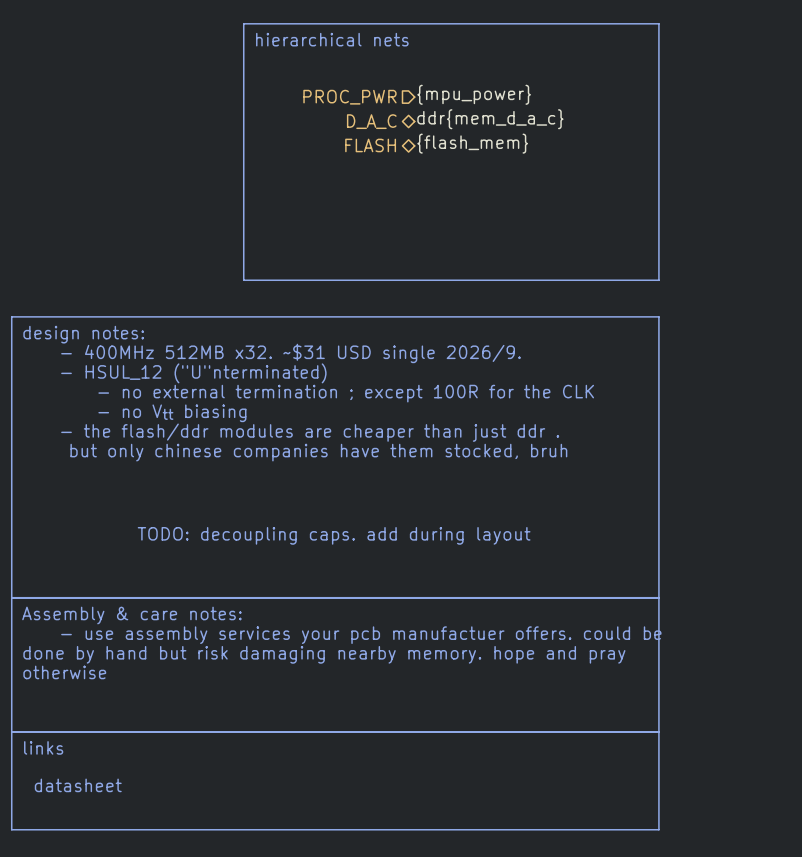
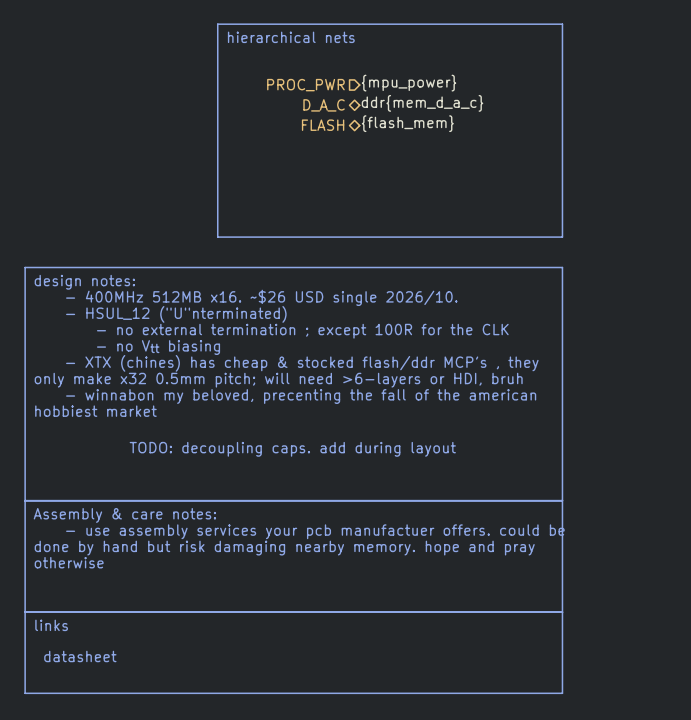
text: - 400MHz 512MB x32. ~$31 USD single 2026/9. (290, 353) -> - 400MHz 512MB x16. ~$26 USD single 2026/10. (261, 297)
text: - the flash/ddr modules are cheaper than just ddr . (310, 432) -> - XTX (chines) has cheap & stocked flash/ddr MCP's , they (302, 363)
text: but only chinese companies have them stocked, bruh (318, 452) -> only make x32 0.5mm pitch; will need >6-layers or HDI, bruh (278, 380)
text: none -> - winnabon my beloved, precenting the fall of the american (301, 396)
text: none -> hobbiest market (95, 411)

